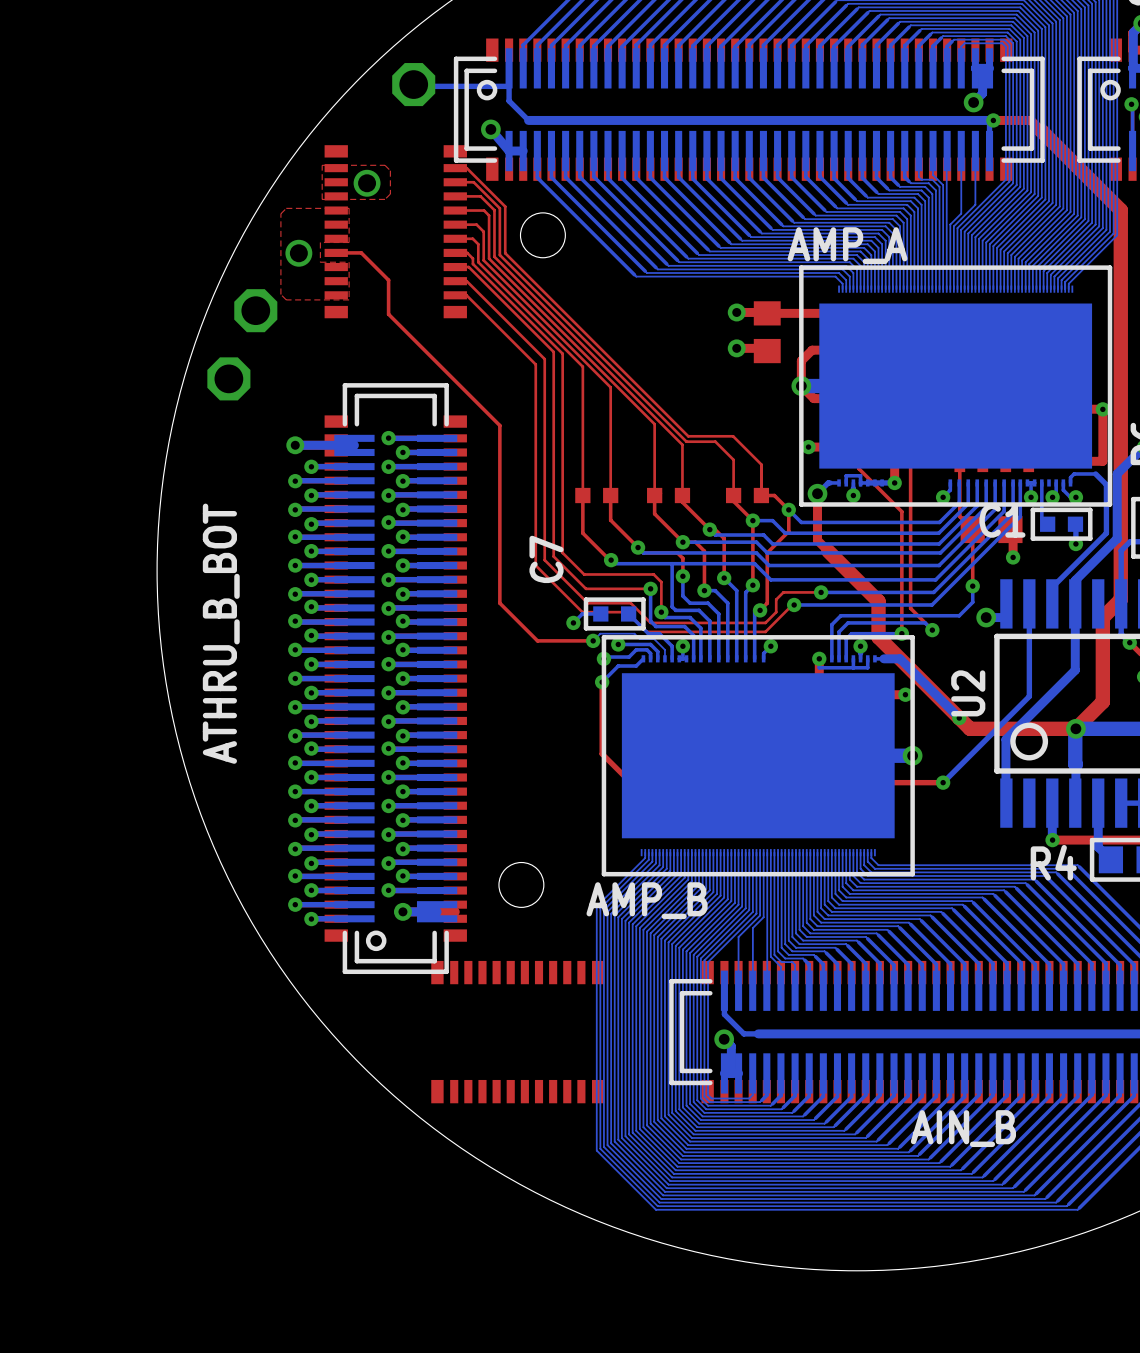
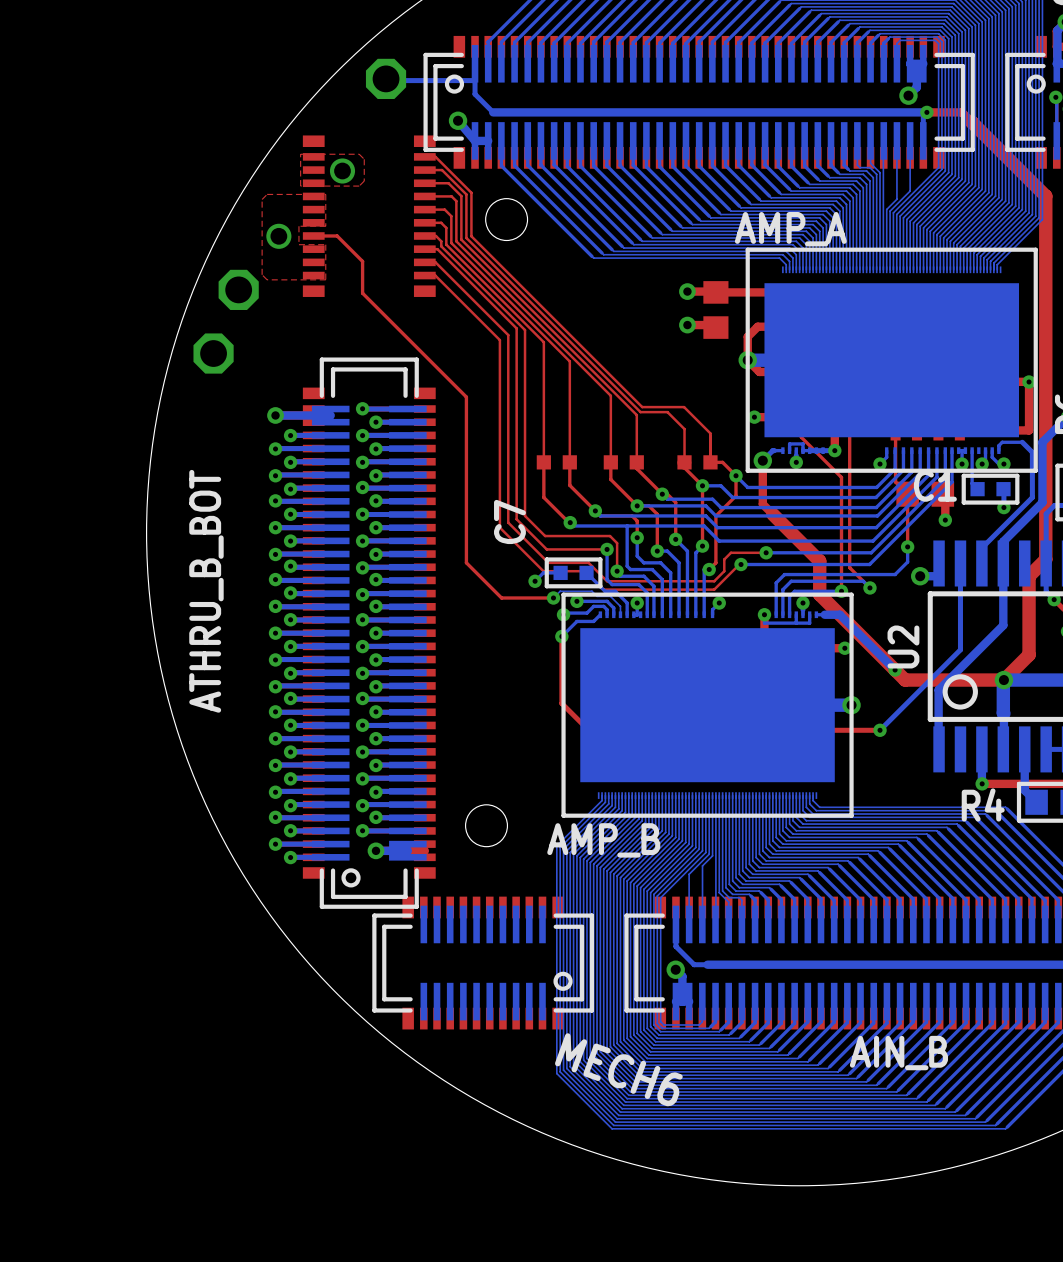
MECH6: none -> (483, 963)

